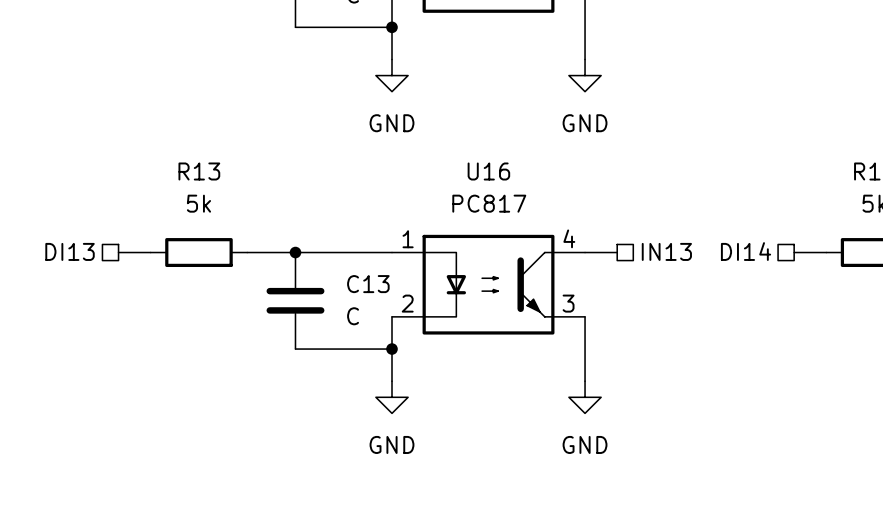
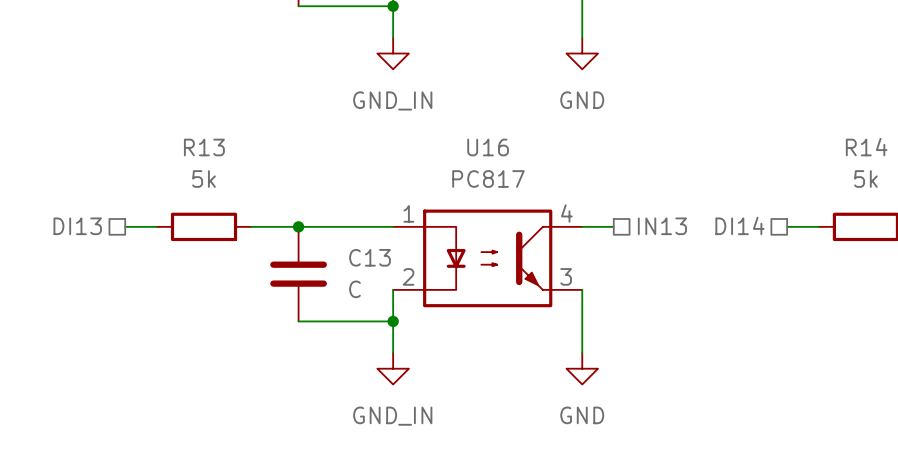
power symbol: GND (392, 75) -> GND_IN (393, 53)
power symbol: GND (392, 397) -> GND_IN (393, 368)

